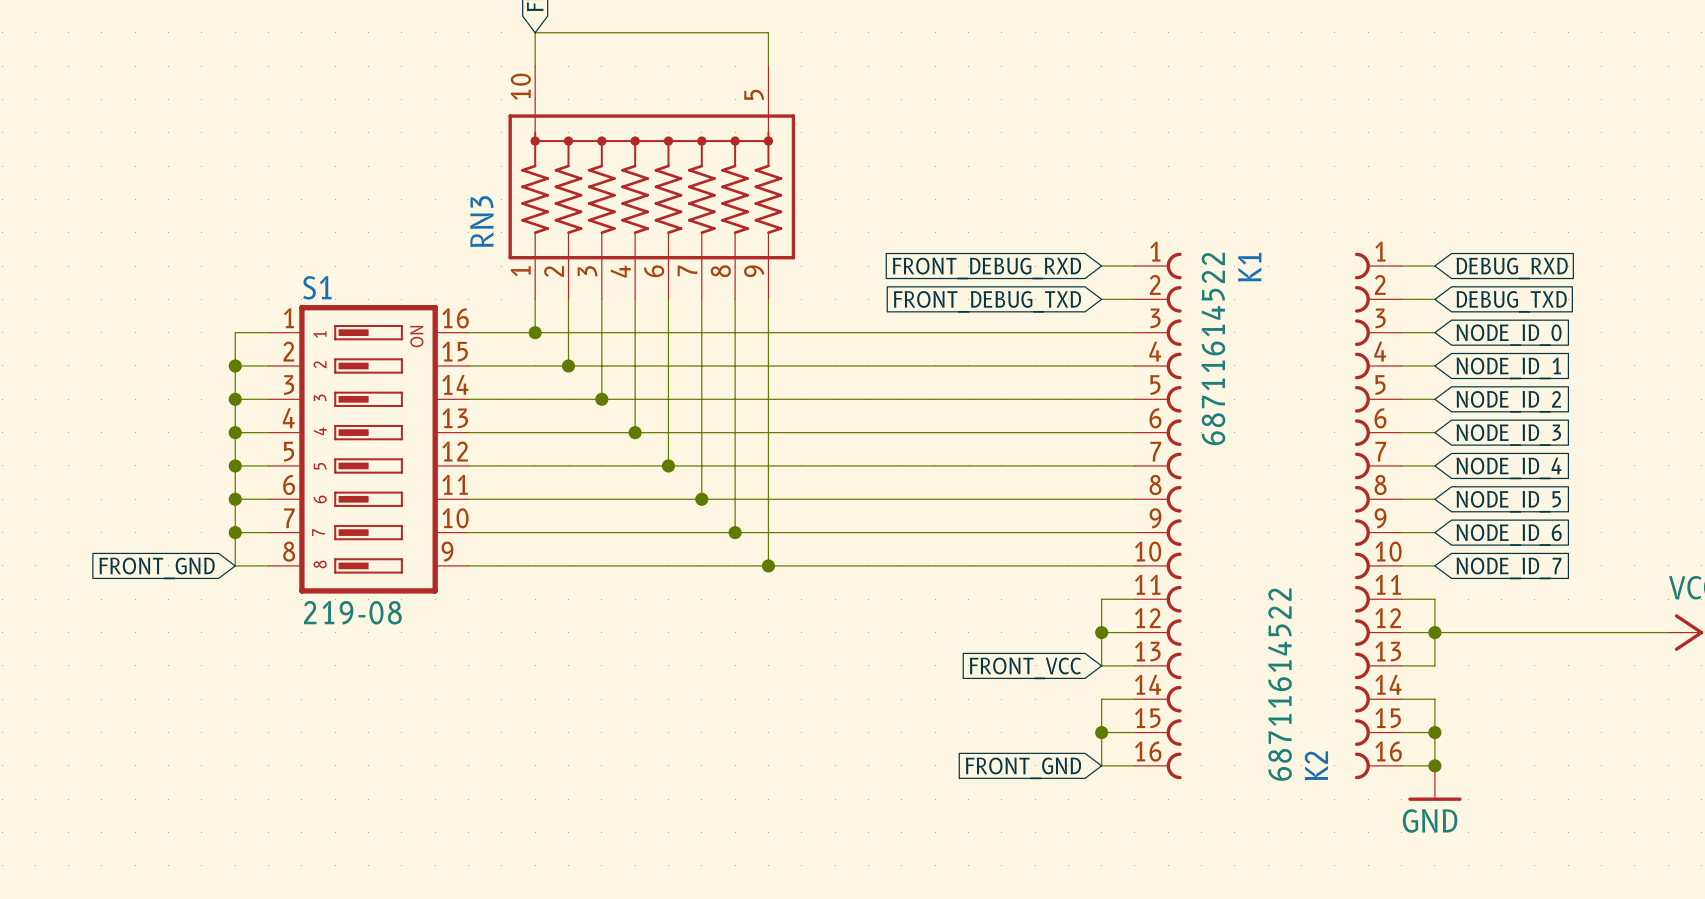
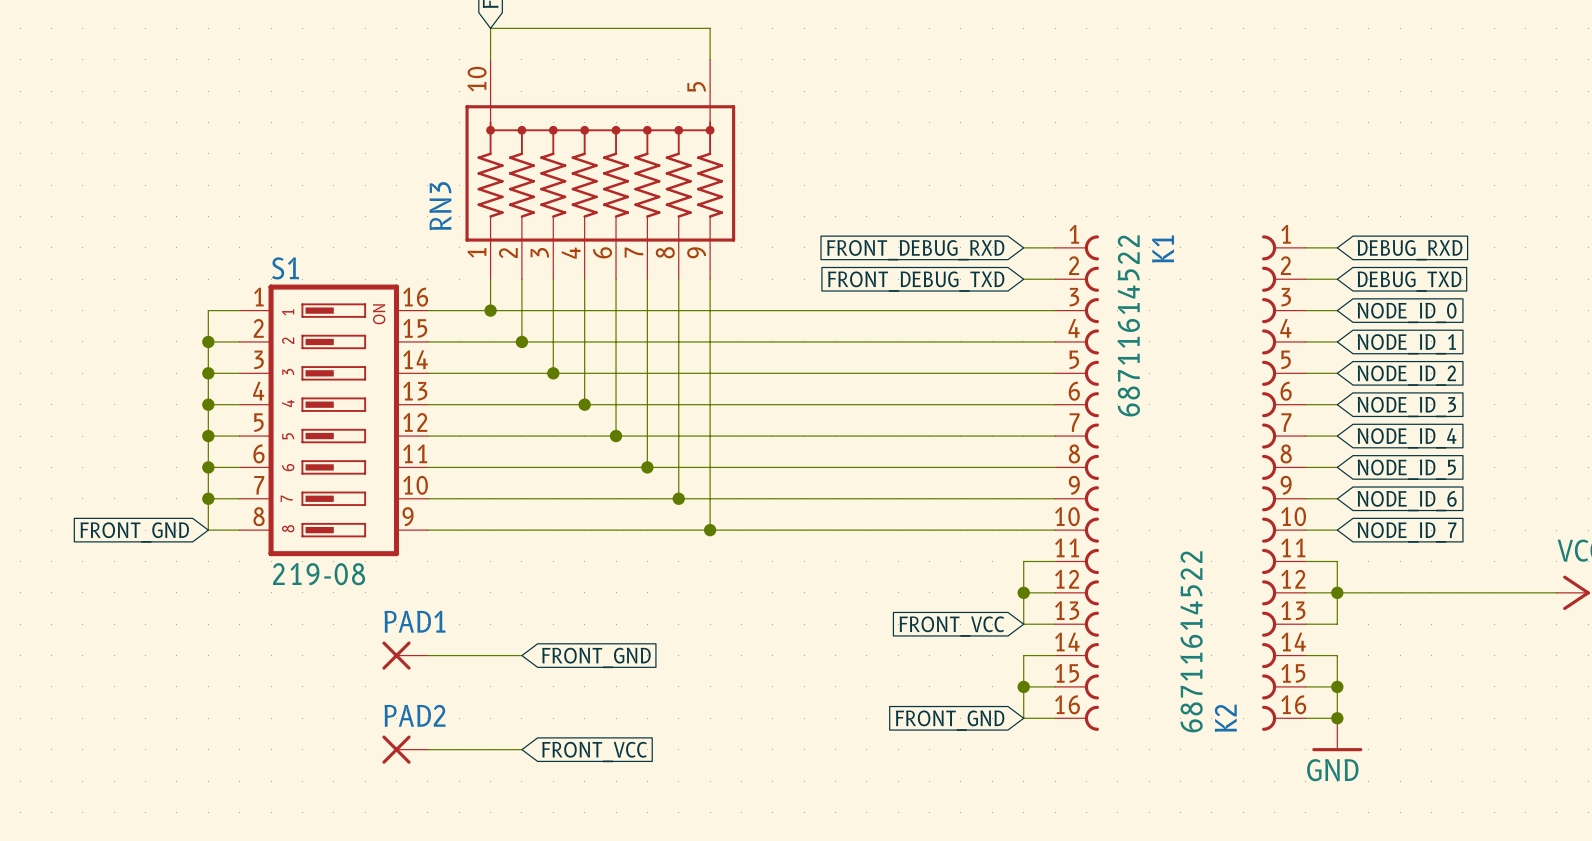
PAD1: none -> (405, 655)
wire: none -> (427, 655) (521, 655)
global label: none -> FRONT_GND (596, 657)
PAD2: none -> (405, 749)
wire: none -> (427, 749) (521, 749)
global label: none -> FRONT_VCC (594, 752)

